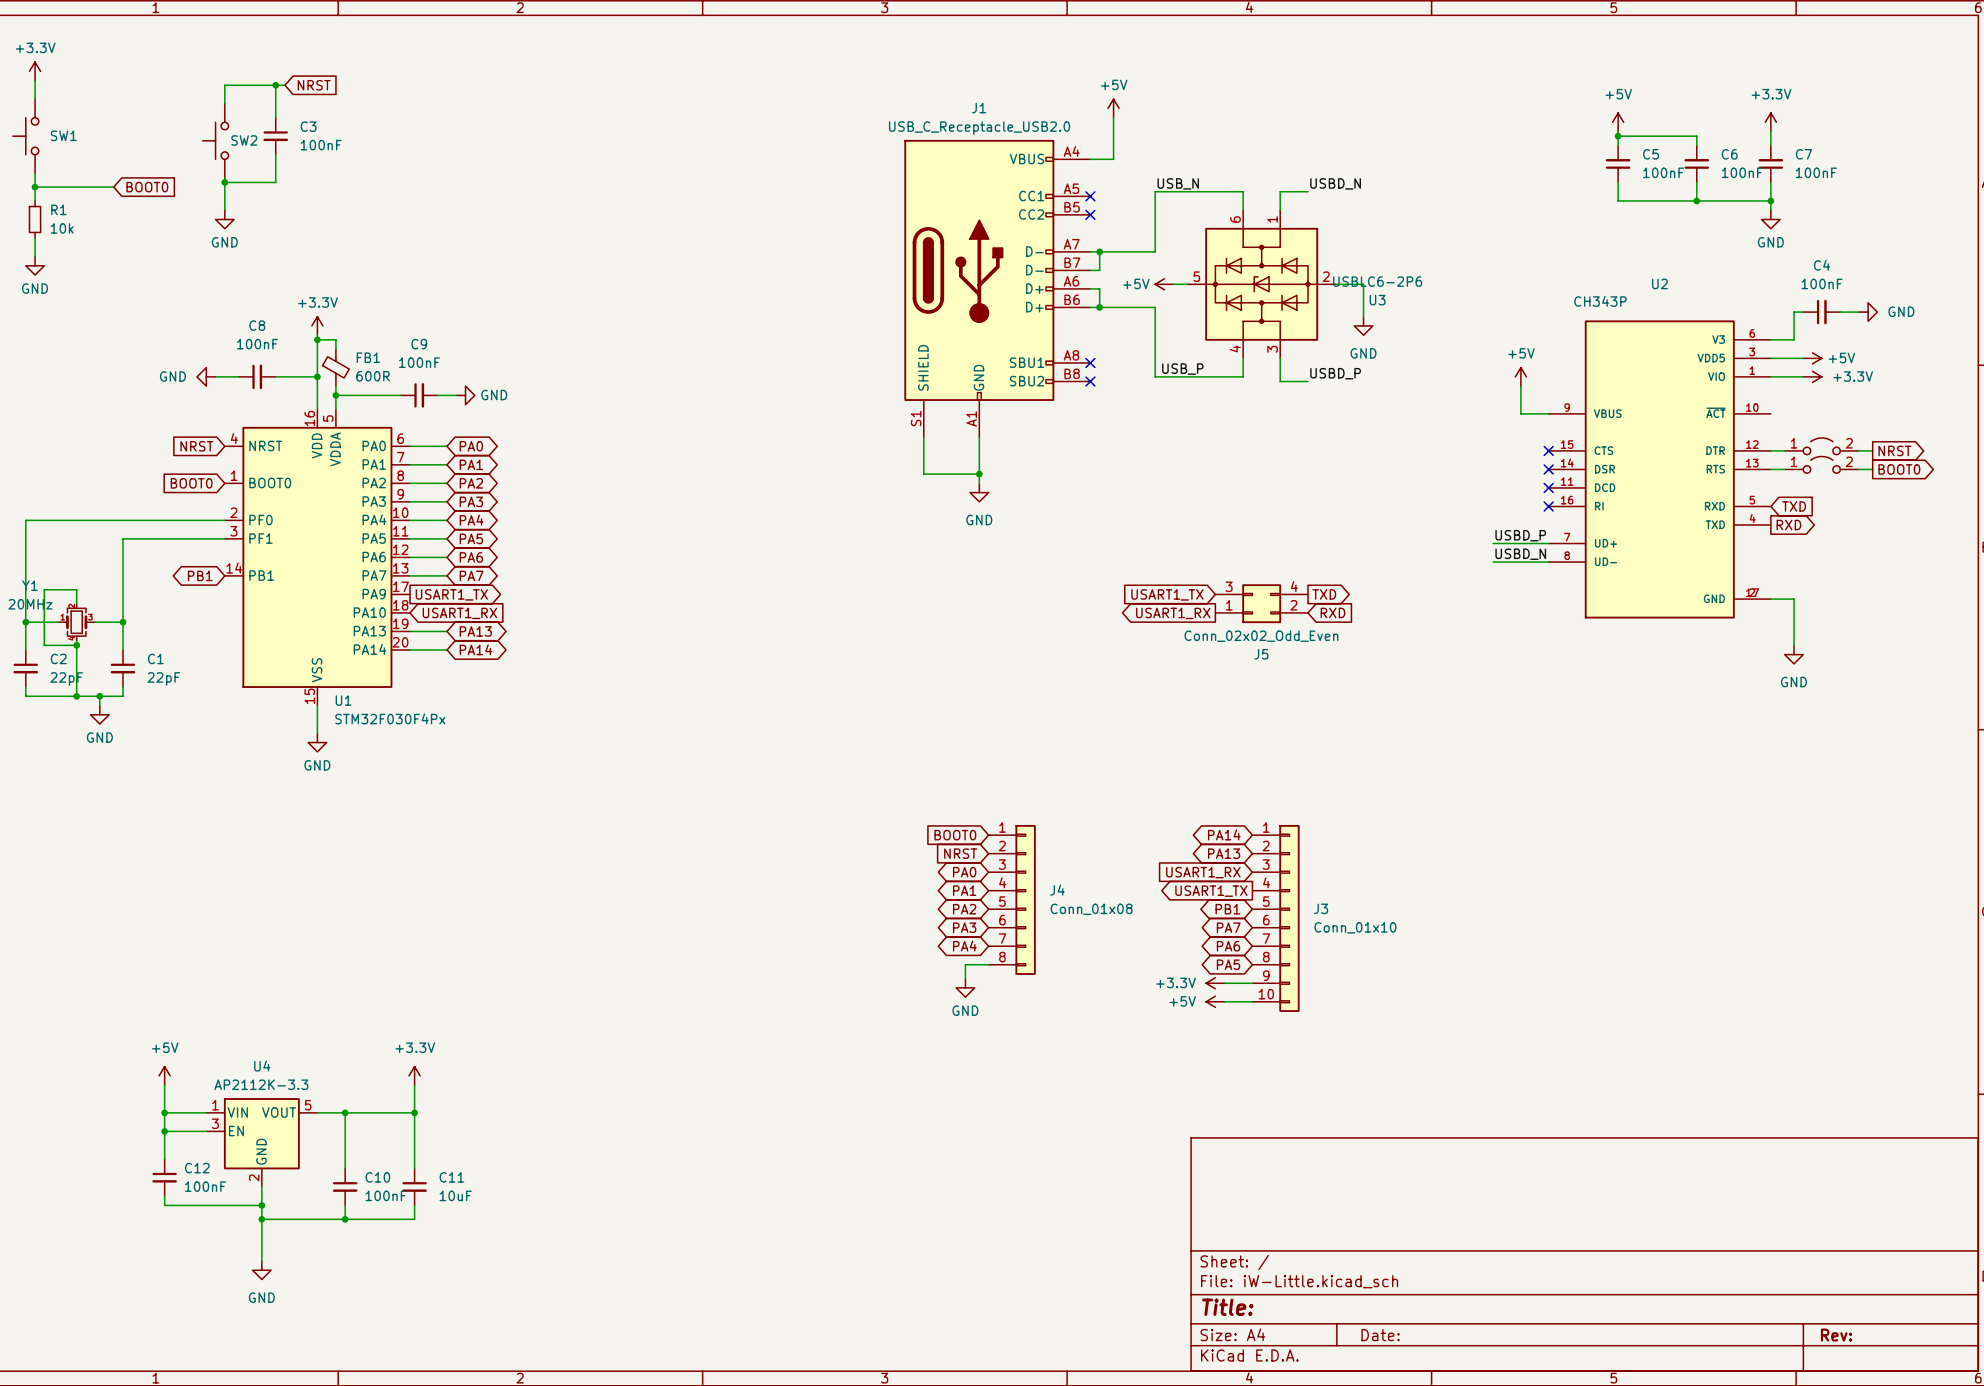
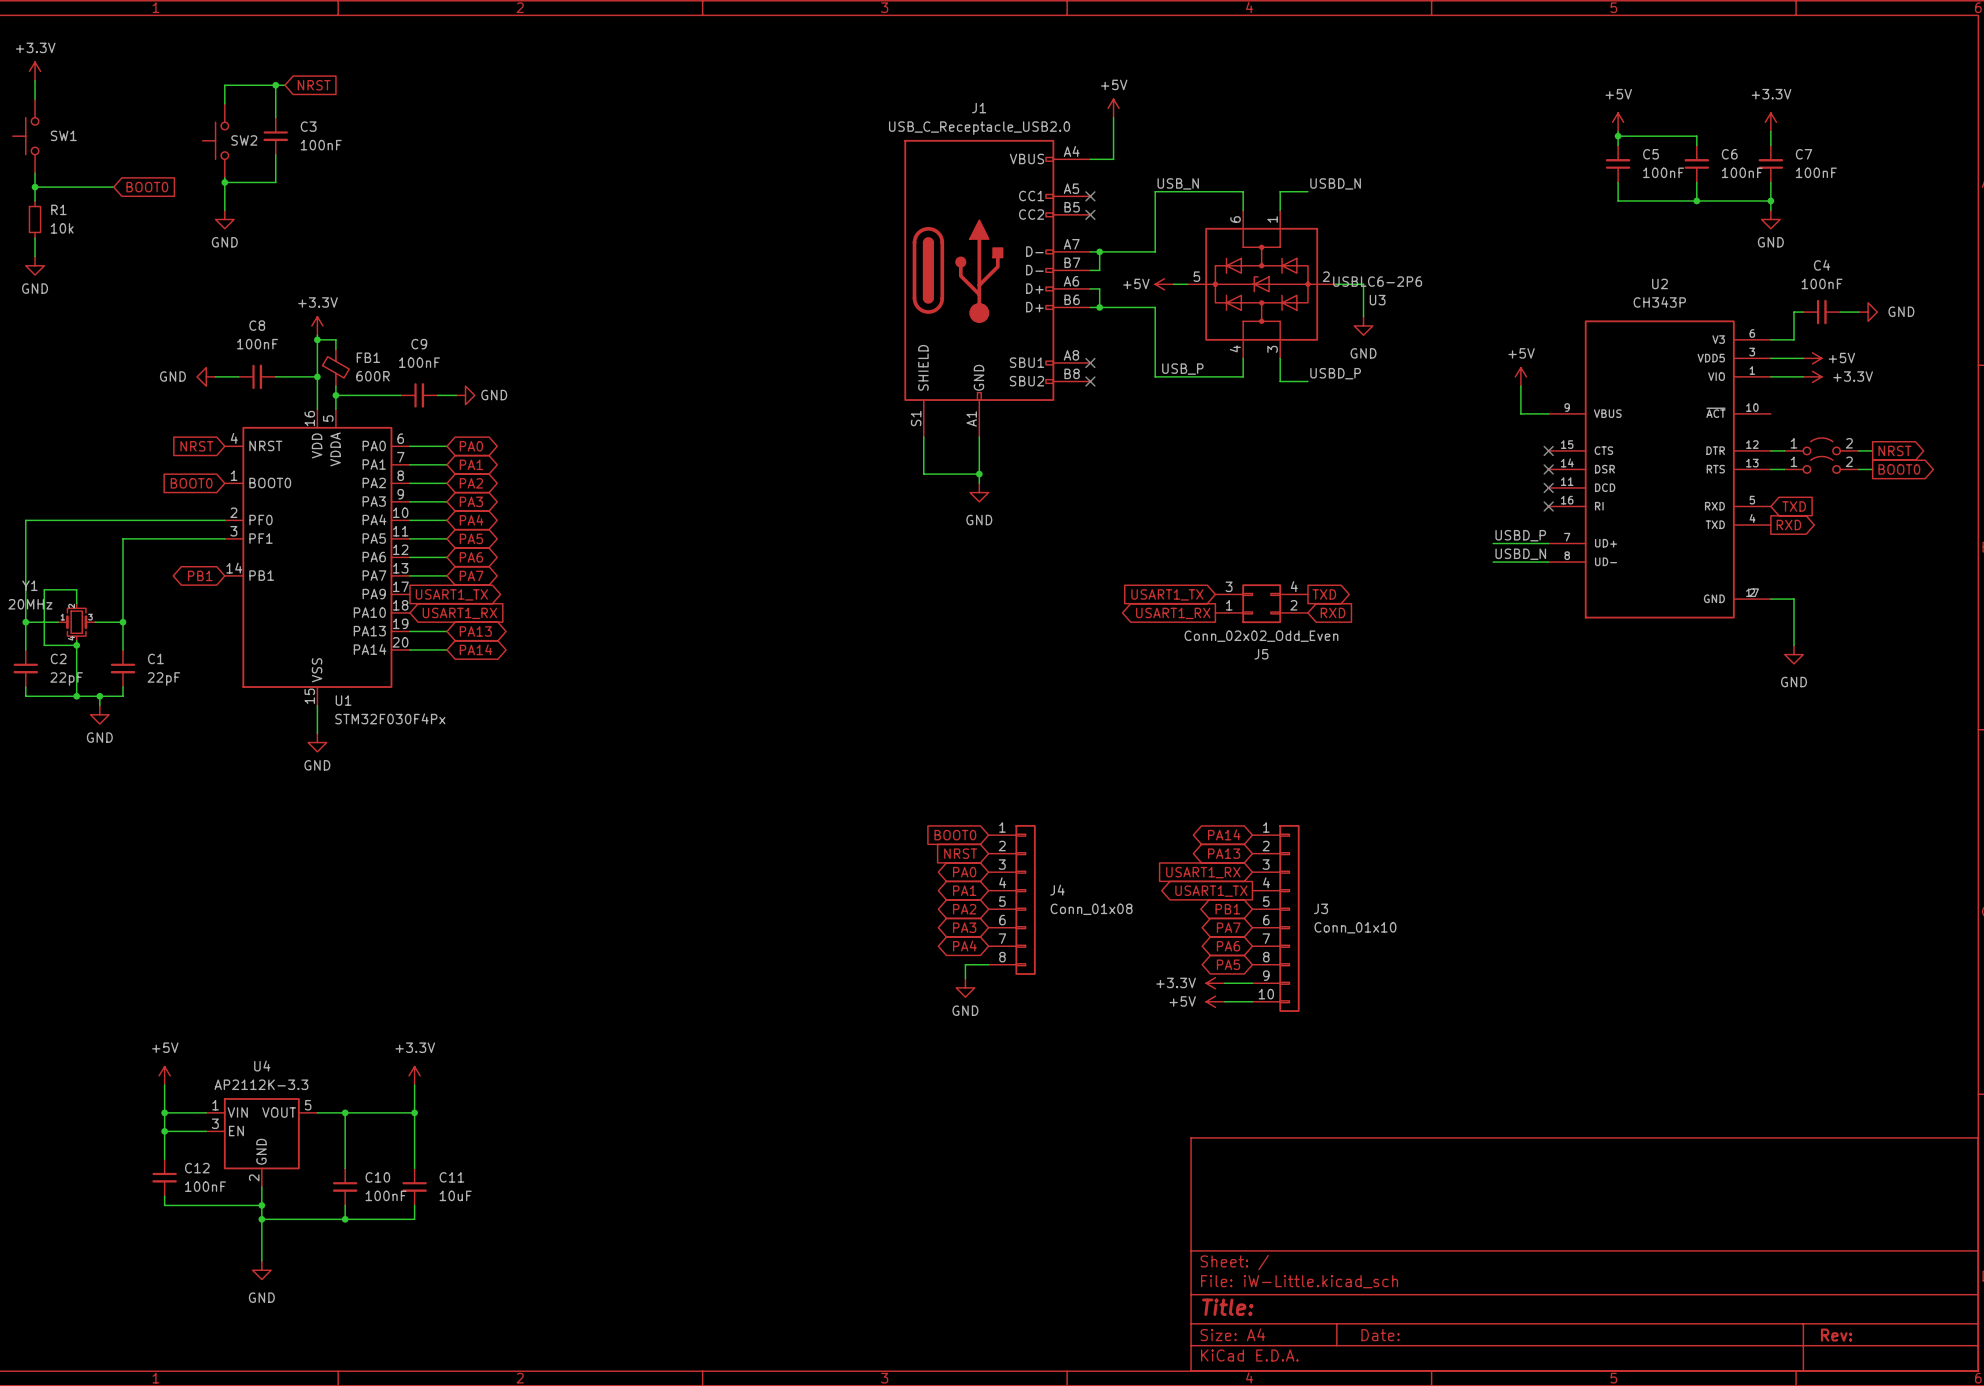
U2 value position: CH343P (1600, 301) -> CH343P (1659, 302)

